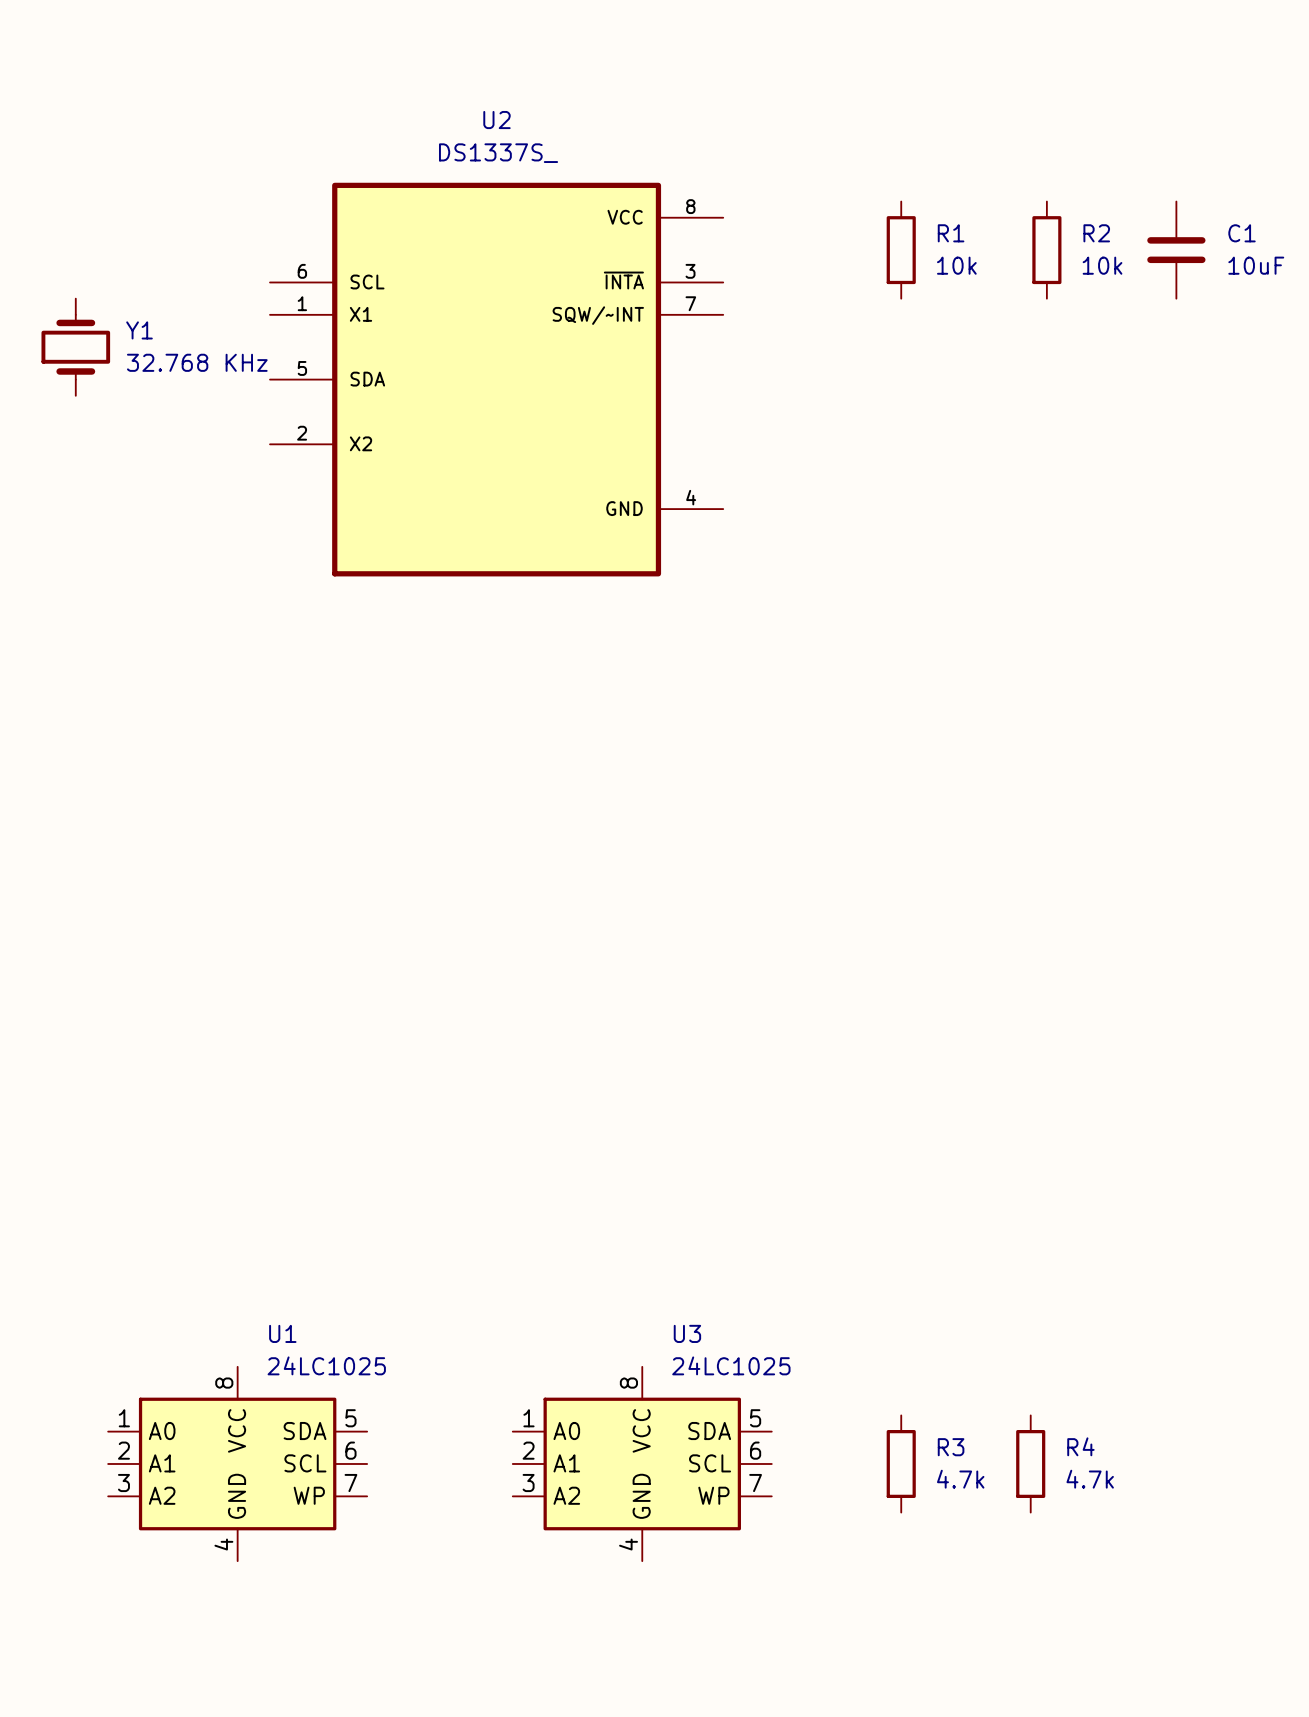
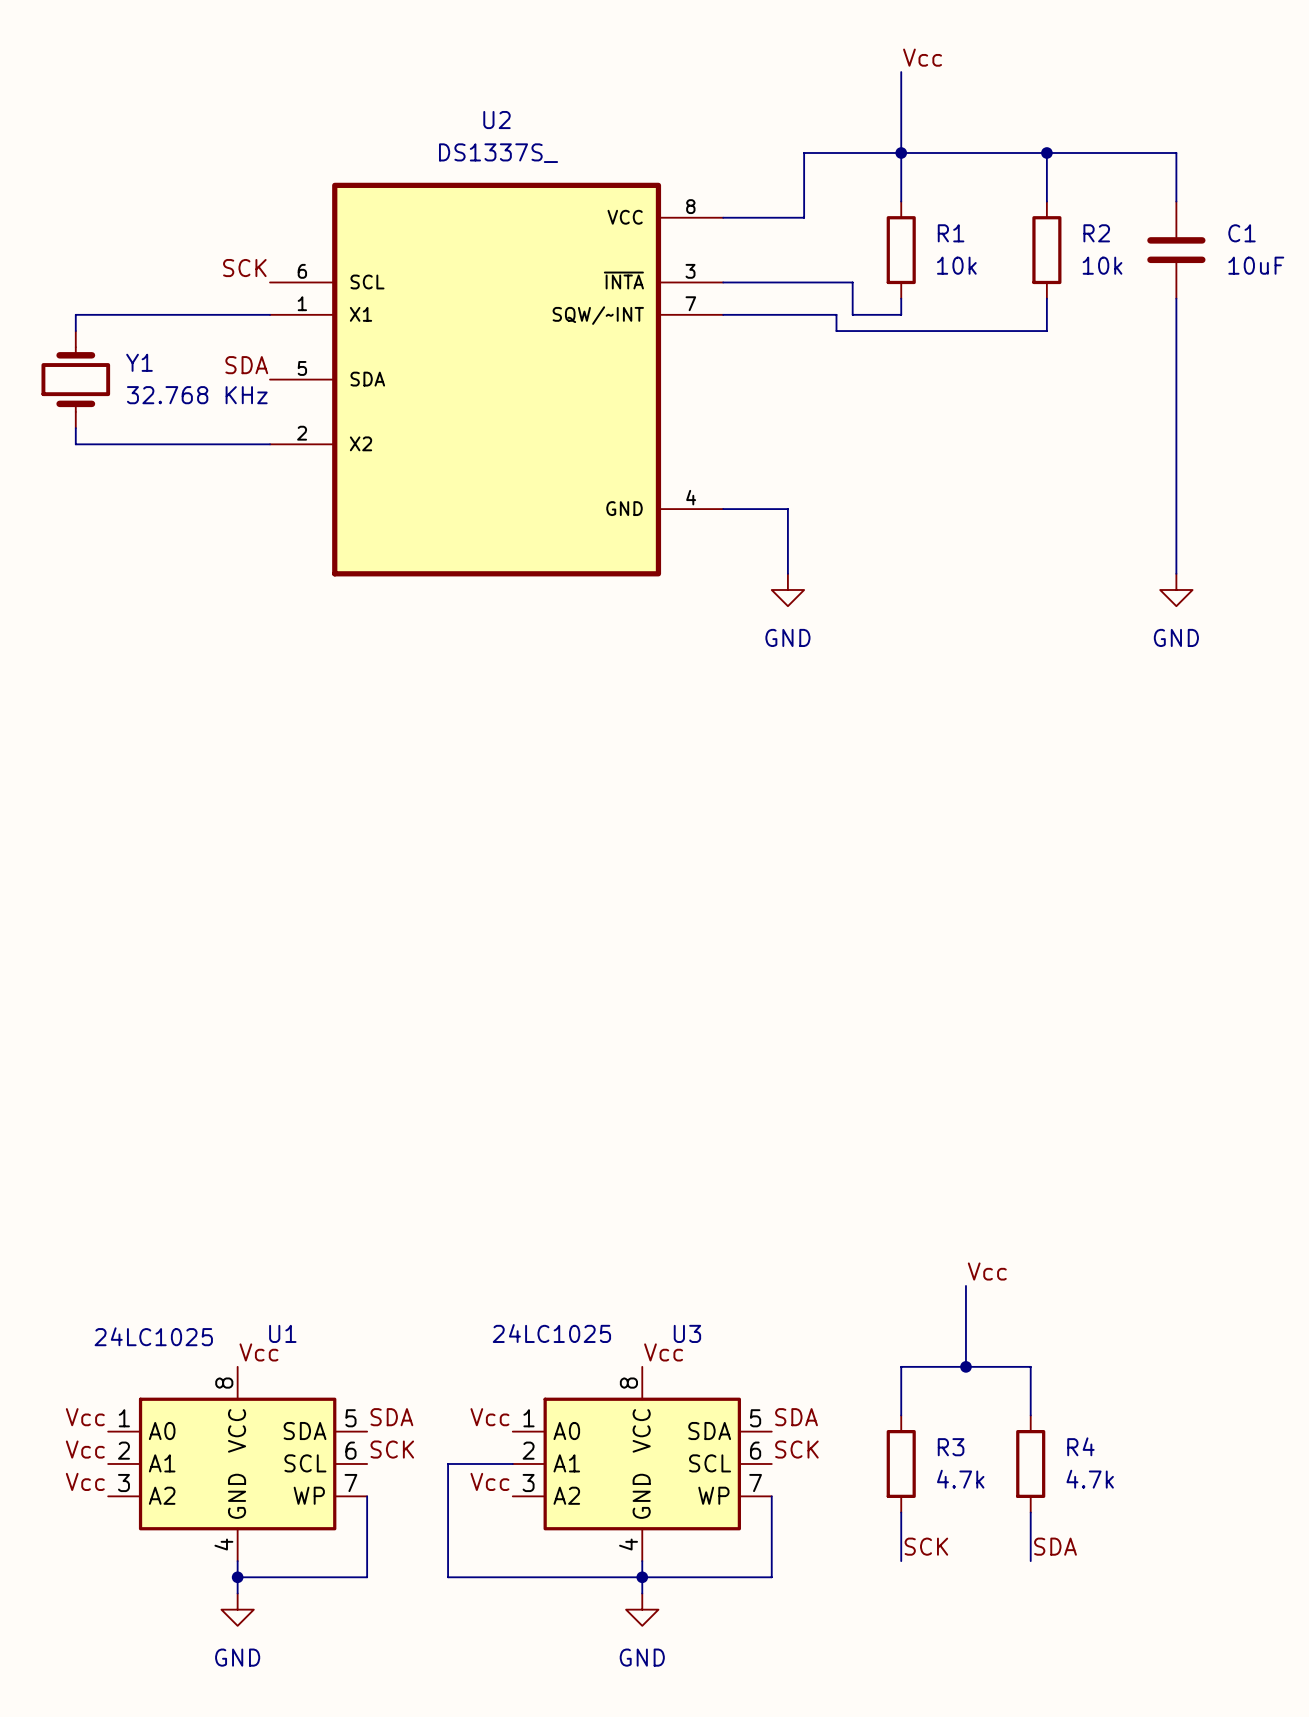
label: none -> Vcc (922, 57)
wire: none -> (901, 72) (901, 201)
junction: none -> (901, 152)
wire: none -> (1046, 152) (1046, 201)
junction: none -> (1046, 152)
wire: none -> (1176, 201) (1176, 152) (804, 152) (804, 217) (723, 217)
label: none -> SCK (244, 268)
wire: none -> (723, 282) (852, 282) (852, 314) (901, 314) (901, 298)
wire: none -> (1046, 298) (1046, 331) (836, 331) (836, 314) (723, 314)
wire: none -> (1176, 298) (1176, 573)
wire: none -> (270, 314) (75, 314) (75, 331)
Y1 position: (75, 347) -> (75, 379)
label: none -> SDA (246, 365)
wire: none -> (75, 428) (75, 444) (270, 444)
wire: none -> (723, 509) (787, 509) (787, 573)
power symbol: none -> GND (787, 589)
power symbol: none -> GND (1176, 589)
label: none -> Vcc (987, 1271)
wire: none -> (965, 1285) (965, 1366)
label: none -> Vcc (258, 1352)
label: none -> Vcc (663, 1352)
U1 value position: 24LC1025 (326, 1365) -> 24LC1025 (153, 1336)
U3 value position: 24LC1025 (731, 1365) -> 24LC1025 (551, 1333)
junction: none -> (965, 1366)
wire: none -> (901, 1415) (901, 1366) (1030, 1366) (1030, 1415)
label: none -> Vcc (85, 1417)
label: none -> SDA (391, 1417)
label: none -> Vcc (489, 1417)
label: none -> SDA (796, 1417)
label: none -> Vcc (85, 1449)
label: none -> SCK (392, 1449)
label: none -> SCK (796, 1449)
wire: none -> (512, 1463) (448, 1463) (448, 1577) (771, 1577) (771, 1496)
label: none -> Vcc (85, 1481)
label: none -> Vcc (489, 1481)
wire: none -> (367, 1496) (367, 1577) (237, 1577)
wire: none -> (901, 1512) (901, 1561)
wire: none -> (1030, 1512) (1030, 1561)
label: none -> SCK (926, 1546)
label: none -> SDA (1055, 1546)
wire: none -> (237, 1561) (237, 1593)
wire: none -> (642, 1561) (642, 1593)
junction: none -> (237, 1577)
junction: none -> (642, 1577)
power symbol: none -> GND (237, 1609)
power symbol: none -> GND (642, 1609)

